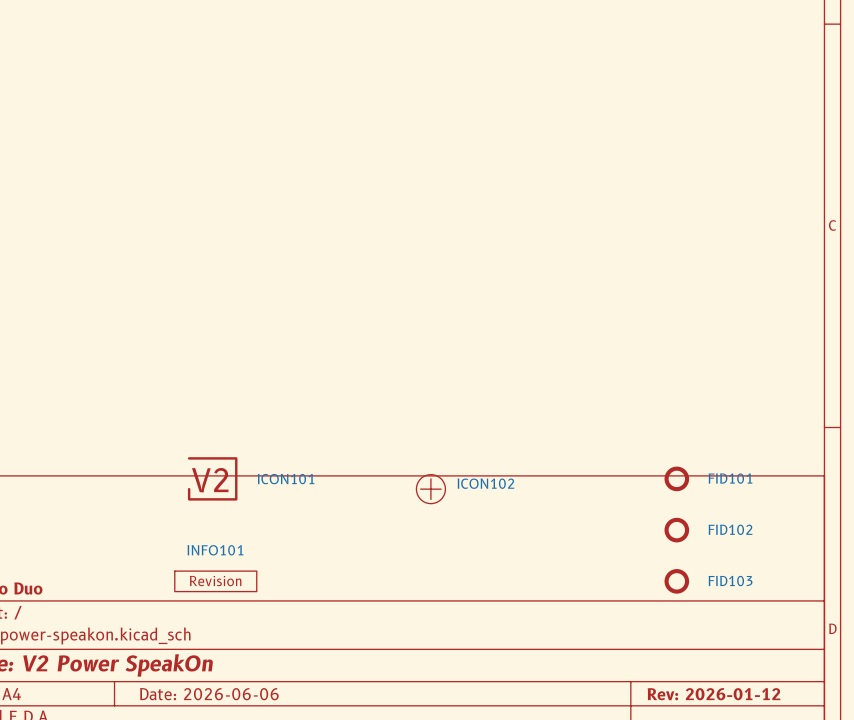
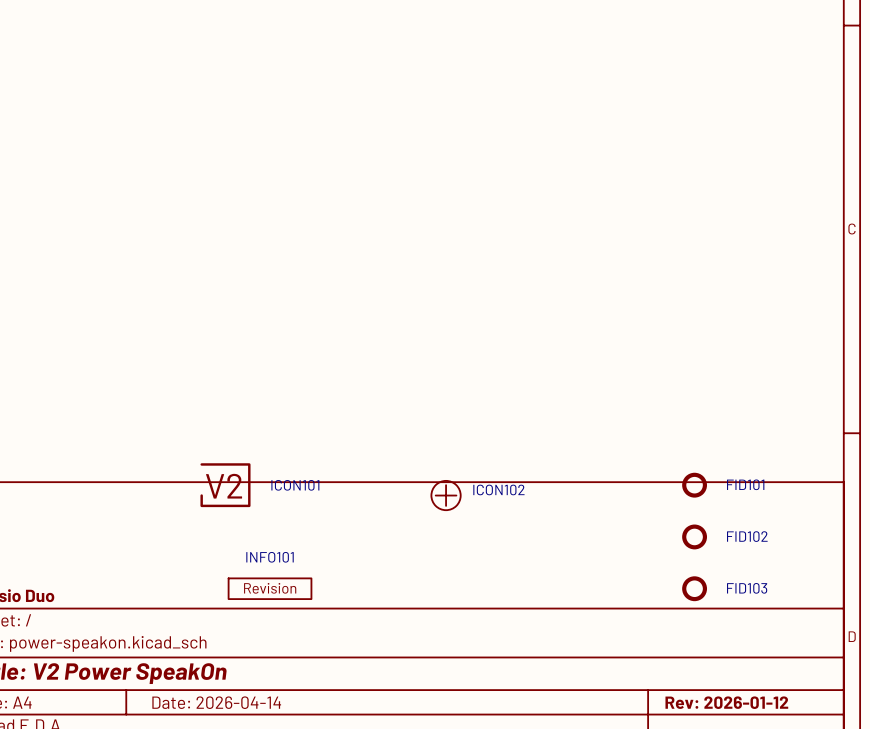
INFO101 position: (215, 581) -> (270, 588)
title block: Date: 2026-06-06 (209, 694) -> Date: 2026-04-14 (216, 702)

